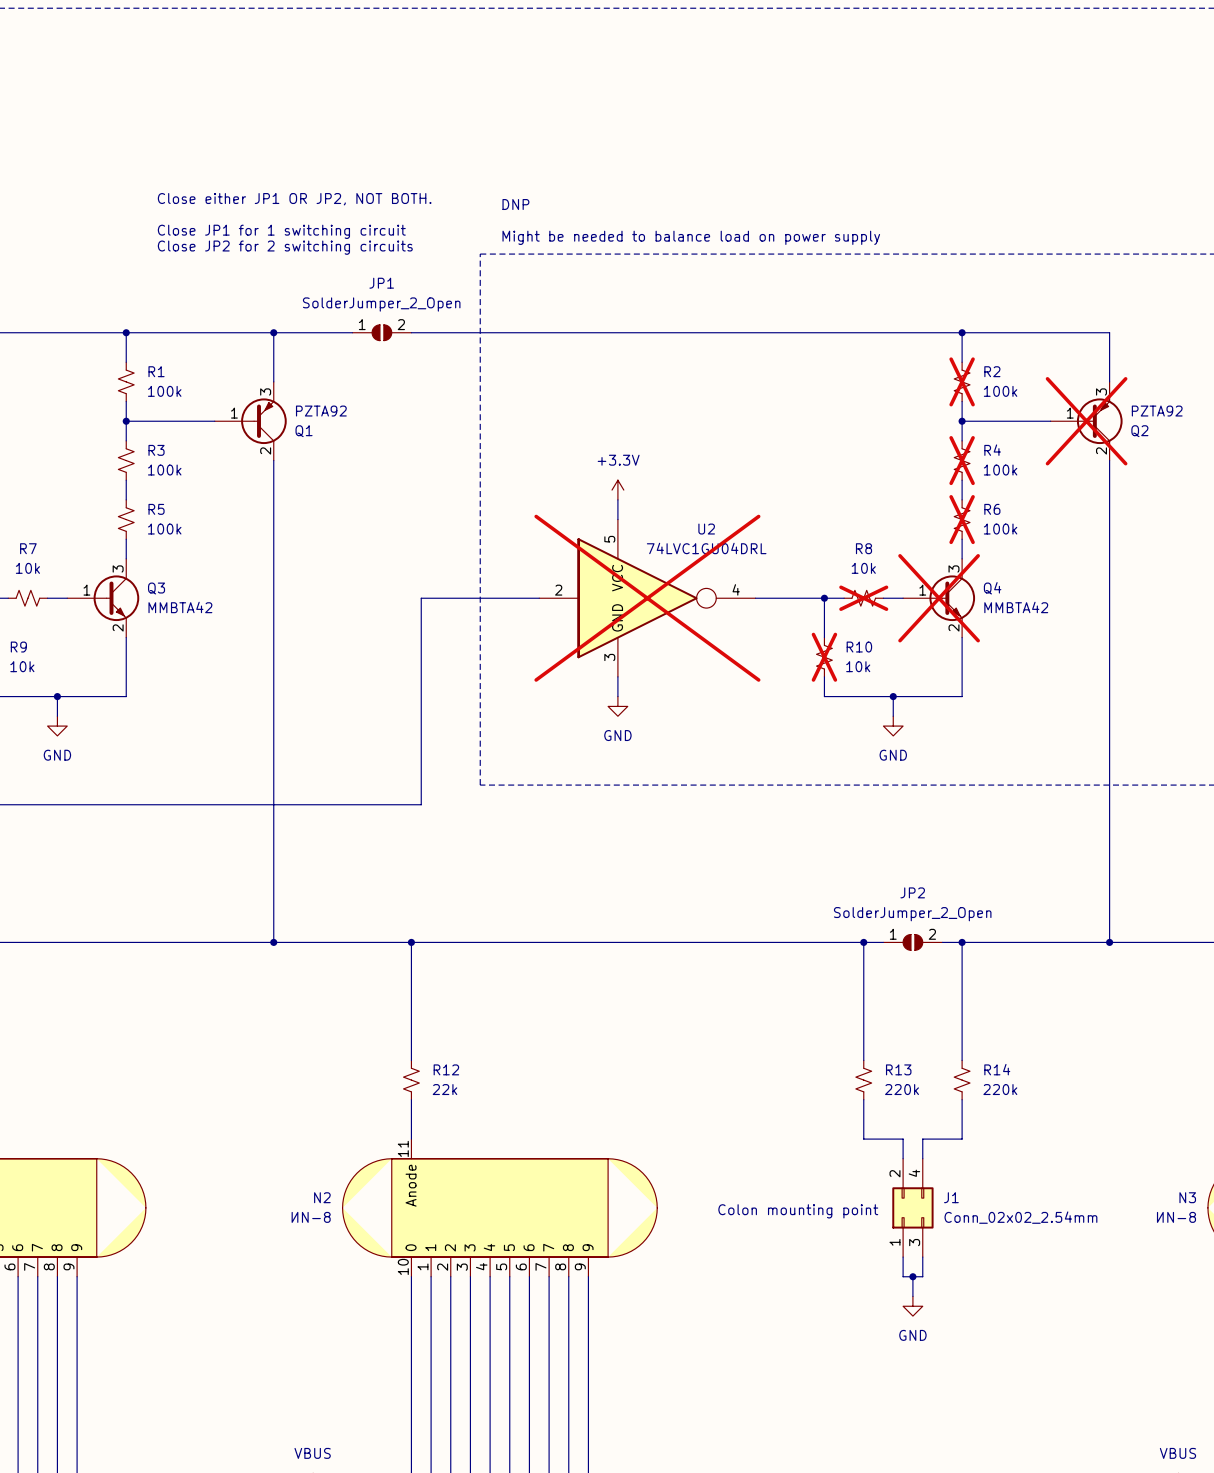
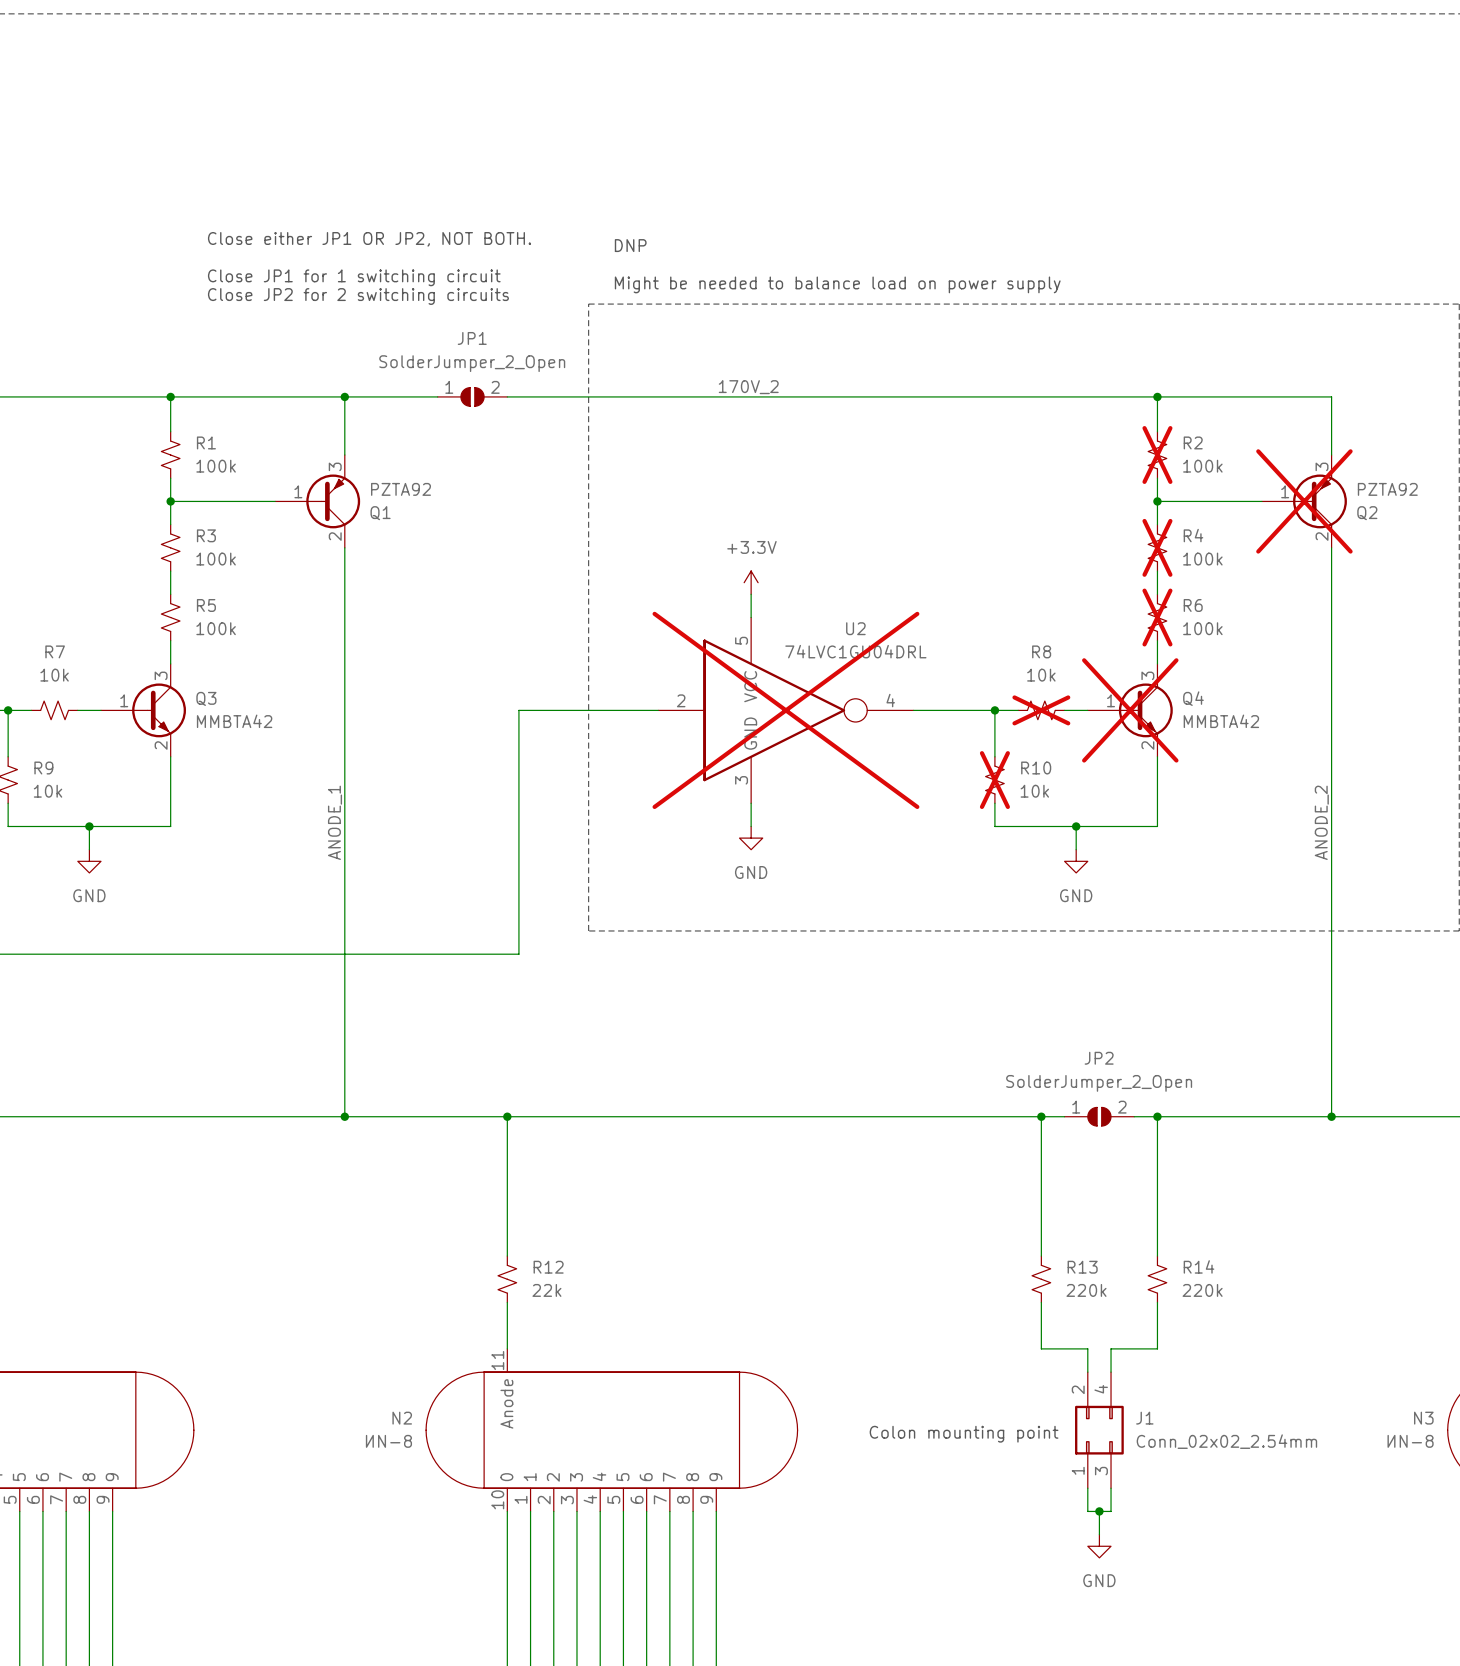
label: none -> 170V_2 (748, 387)
label: none -> ANODE_1 (335, 822)
label: none -> ANODE_2 (1321, 822)

